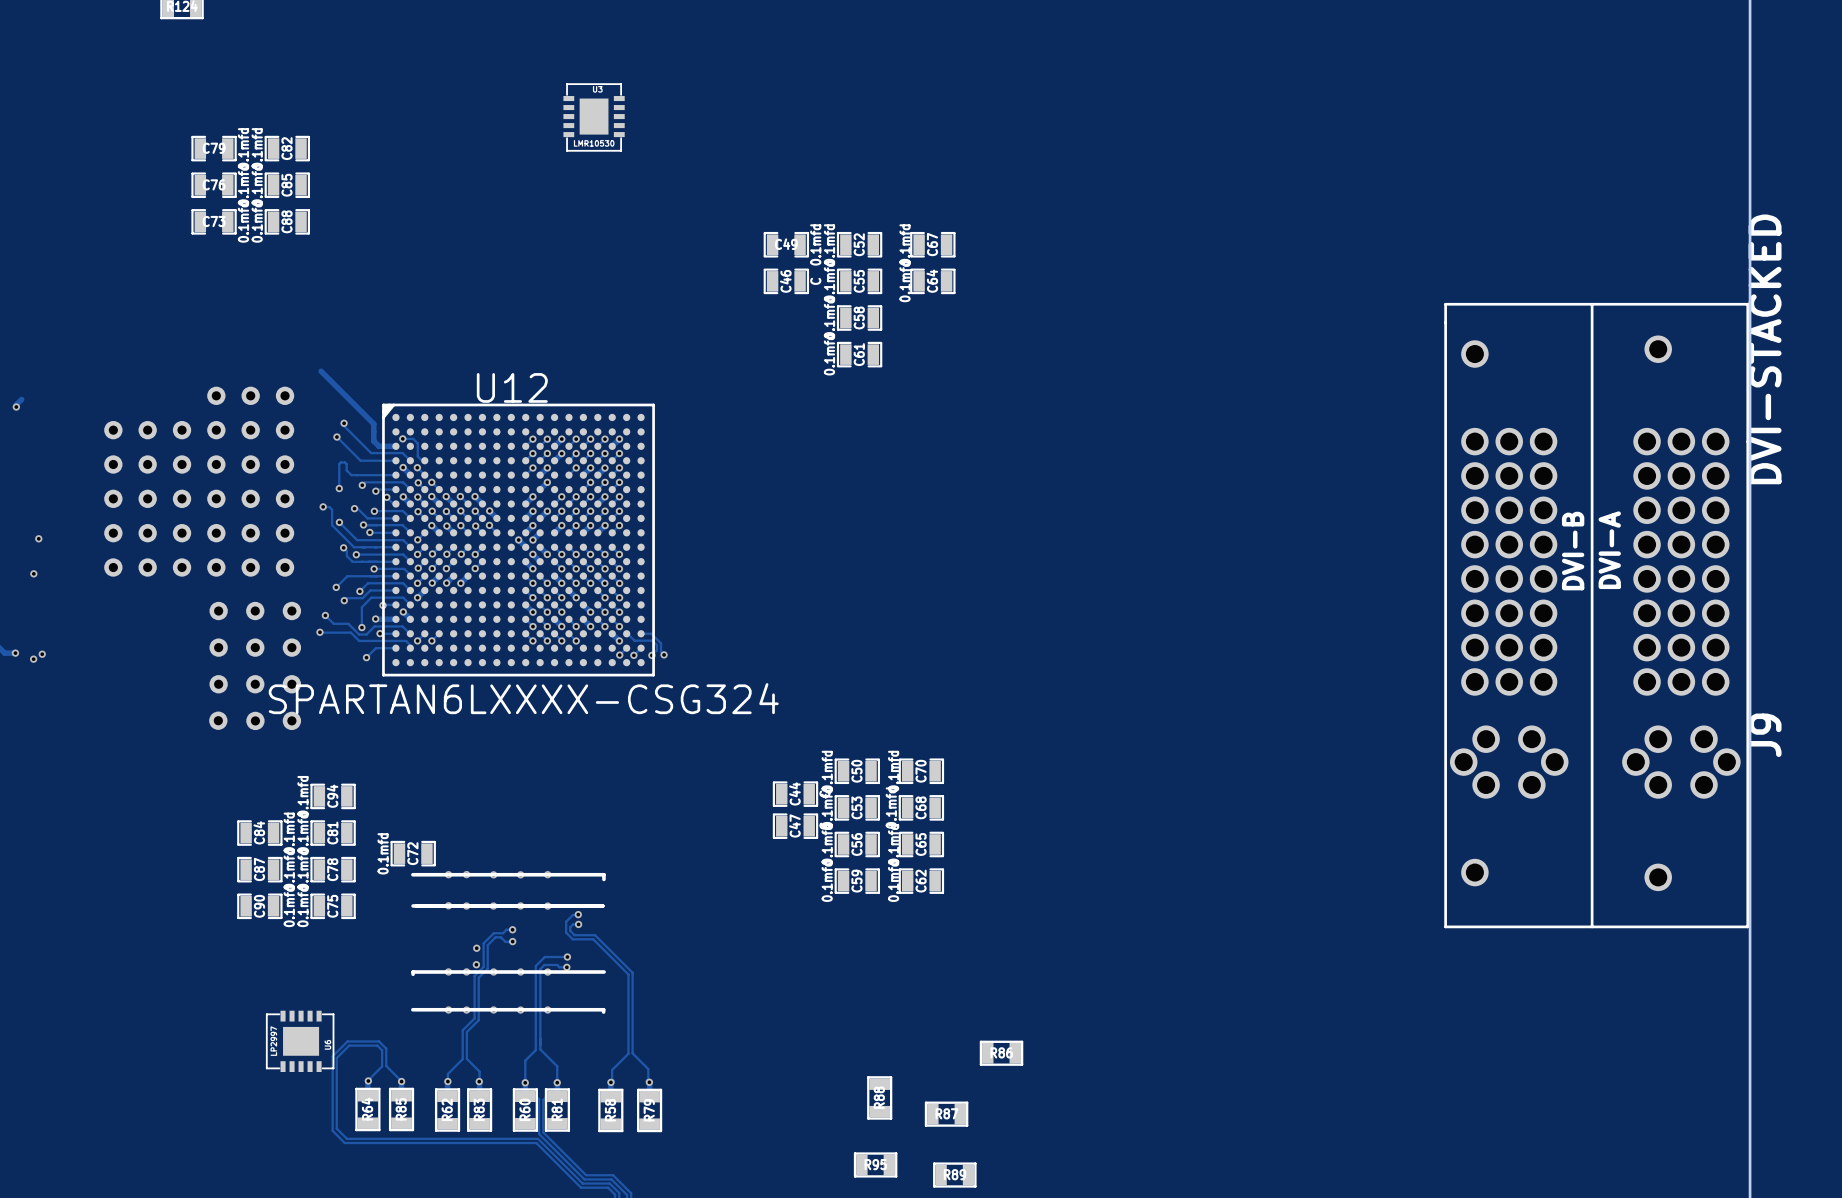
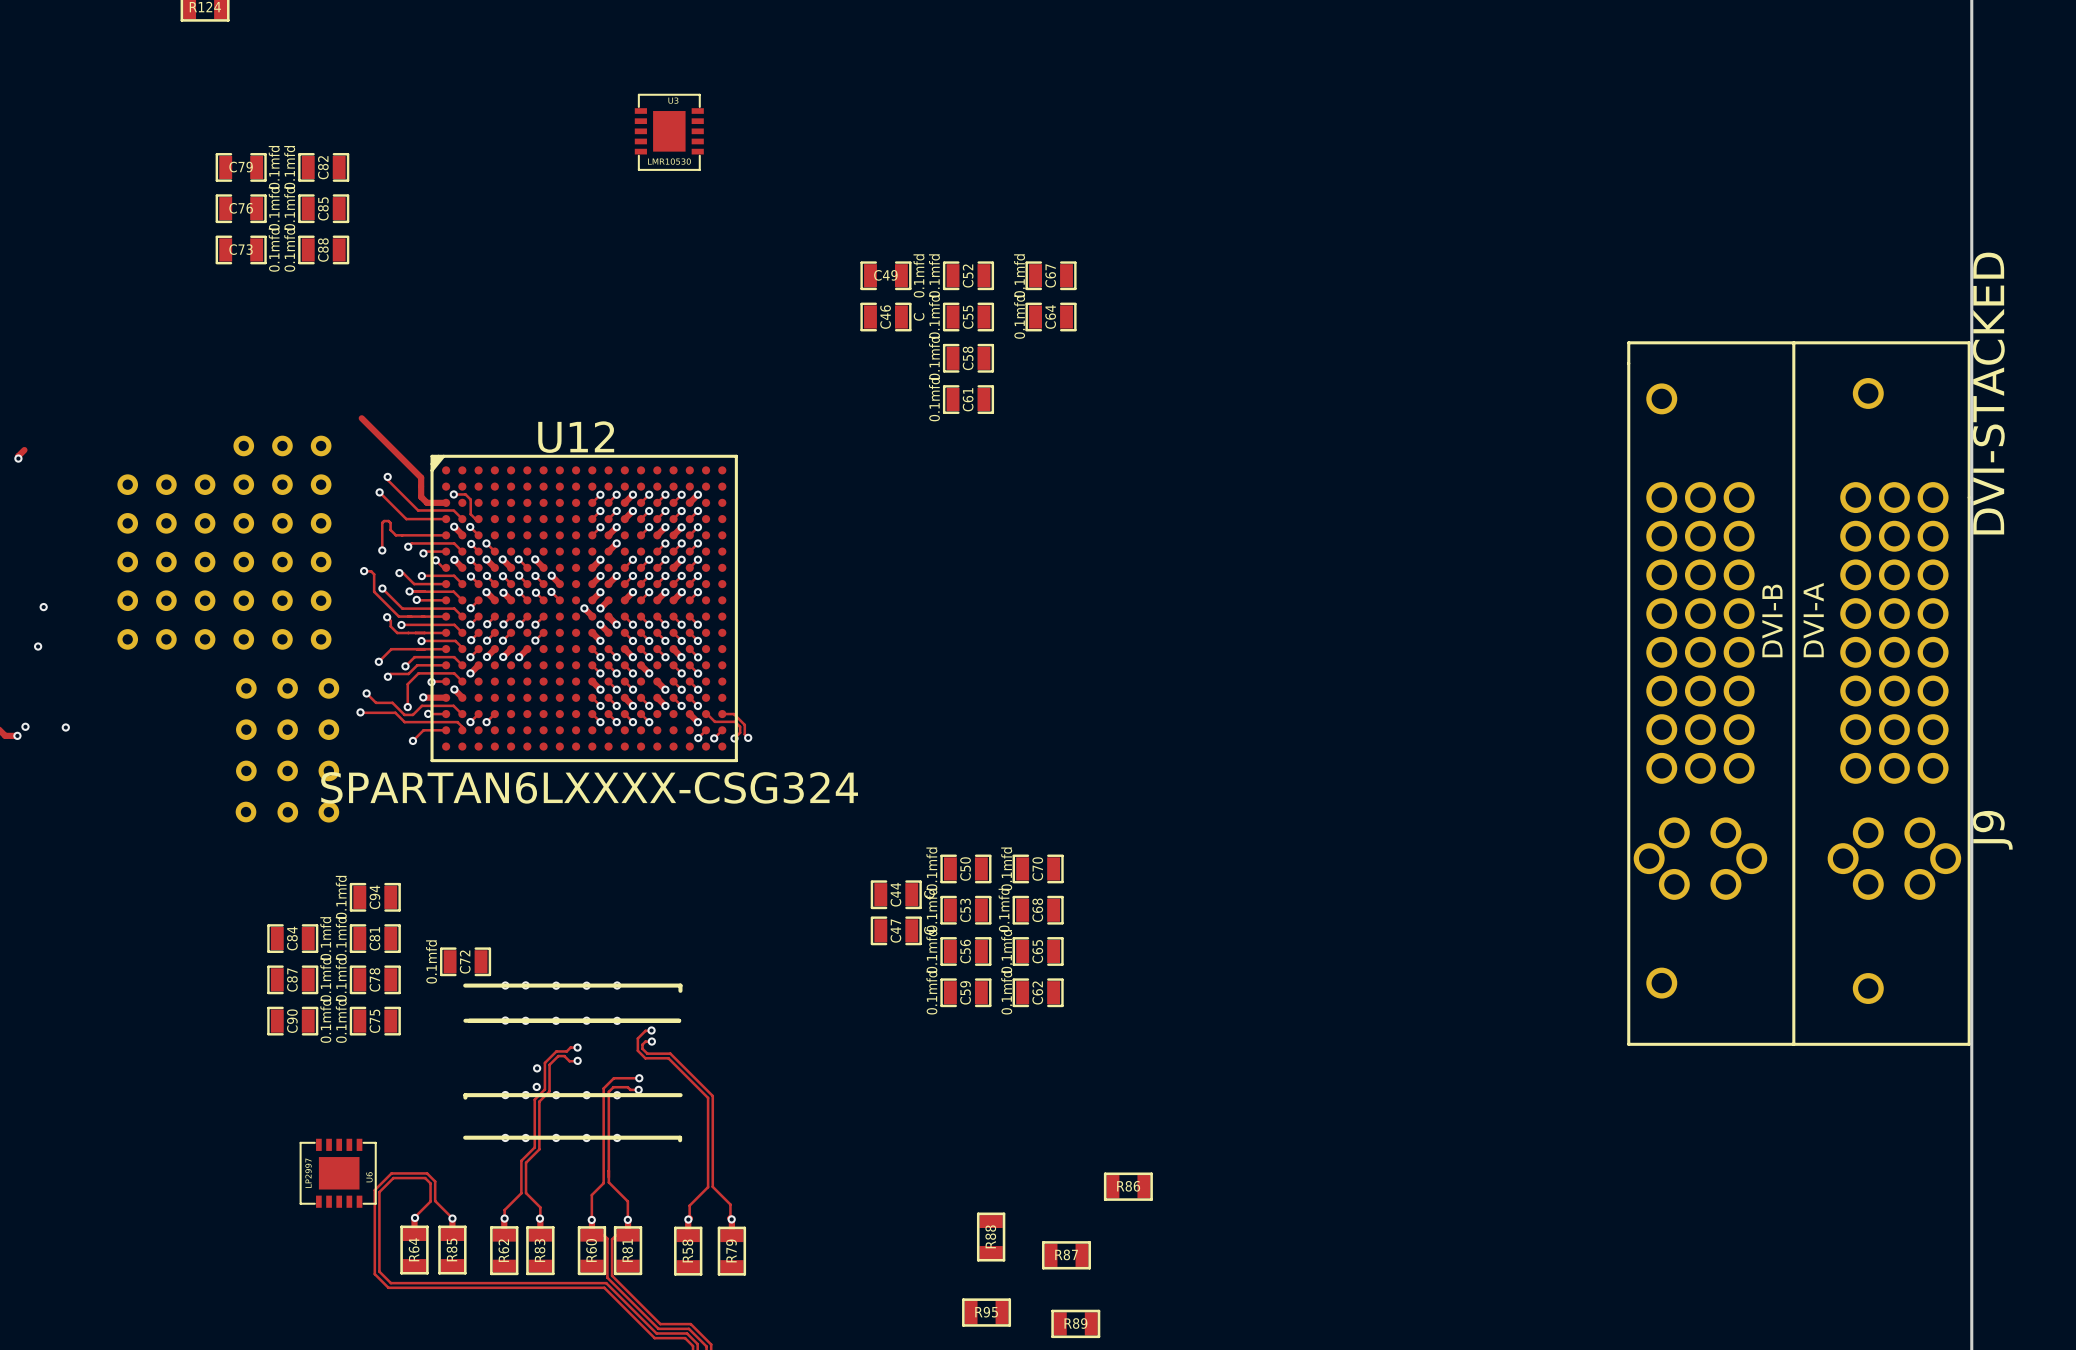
via: none -> (25, 726)
via: none -> (65, 727)
via: (42, 654) -> none
via: (33, 659) -> none

